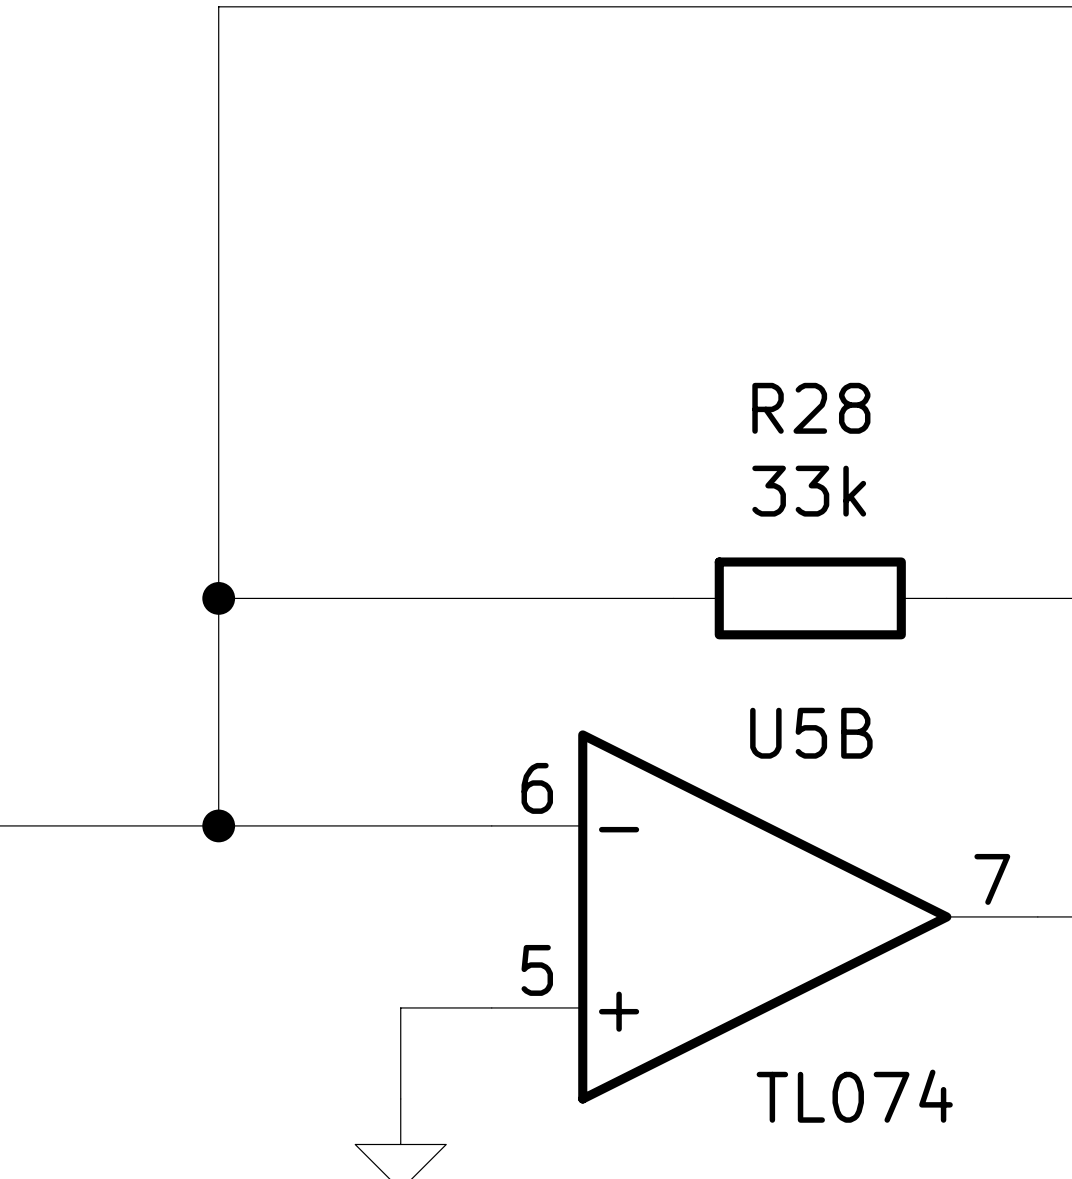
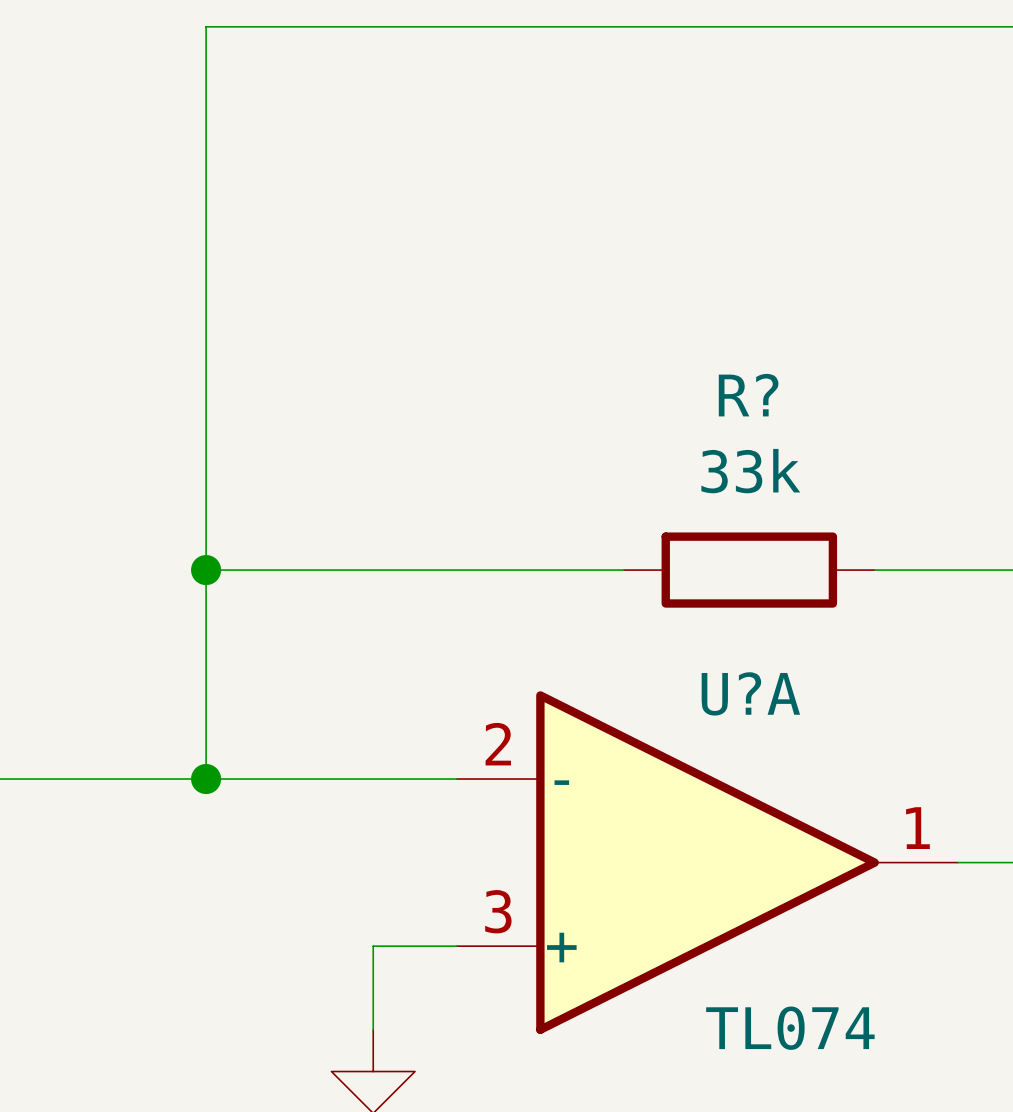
R28 name: R28 (811, 408) -> R? (748, 395)
U5B name: U5B (811, 733) -> U?A (750, 693)
U5B pin number: 6 (537, 788) -> 2 (498, 744)
U5B pin number: 7 (992, 879) -> 1 (917, 828)
U5B pin number: 5 (537, 970) -> 3 (498, 911)

